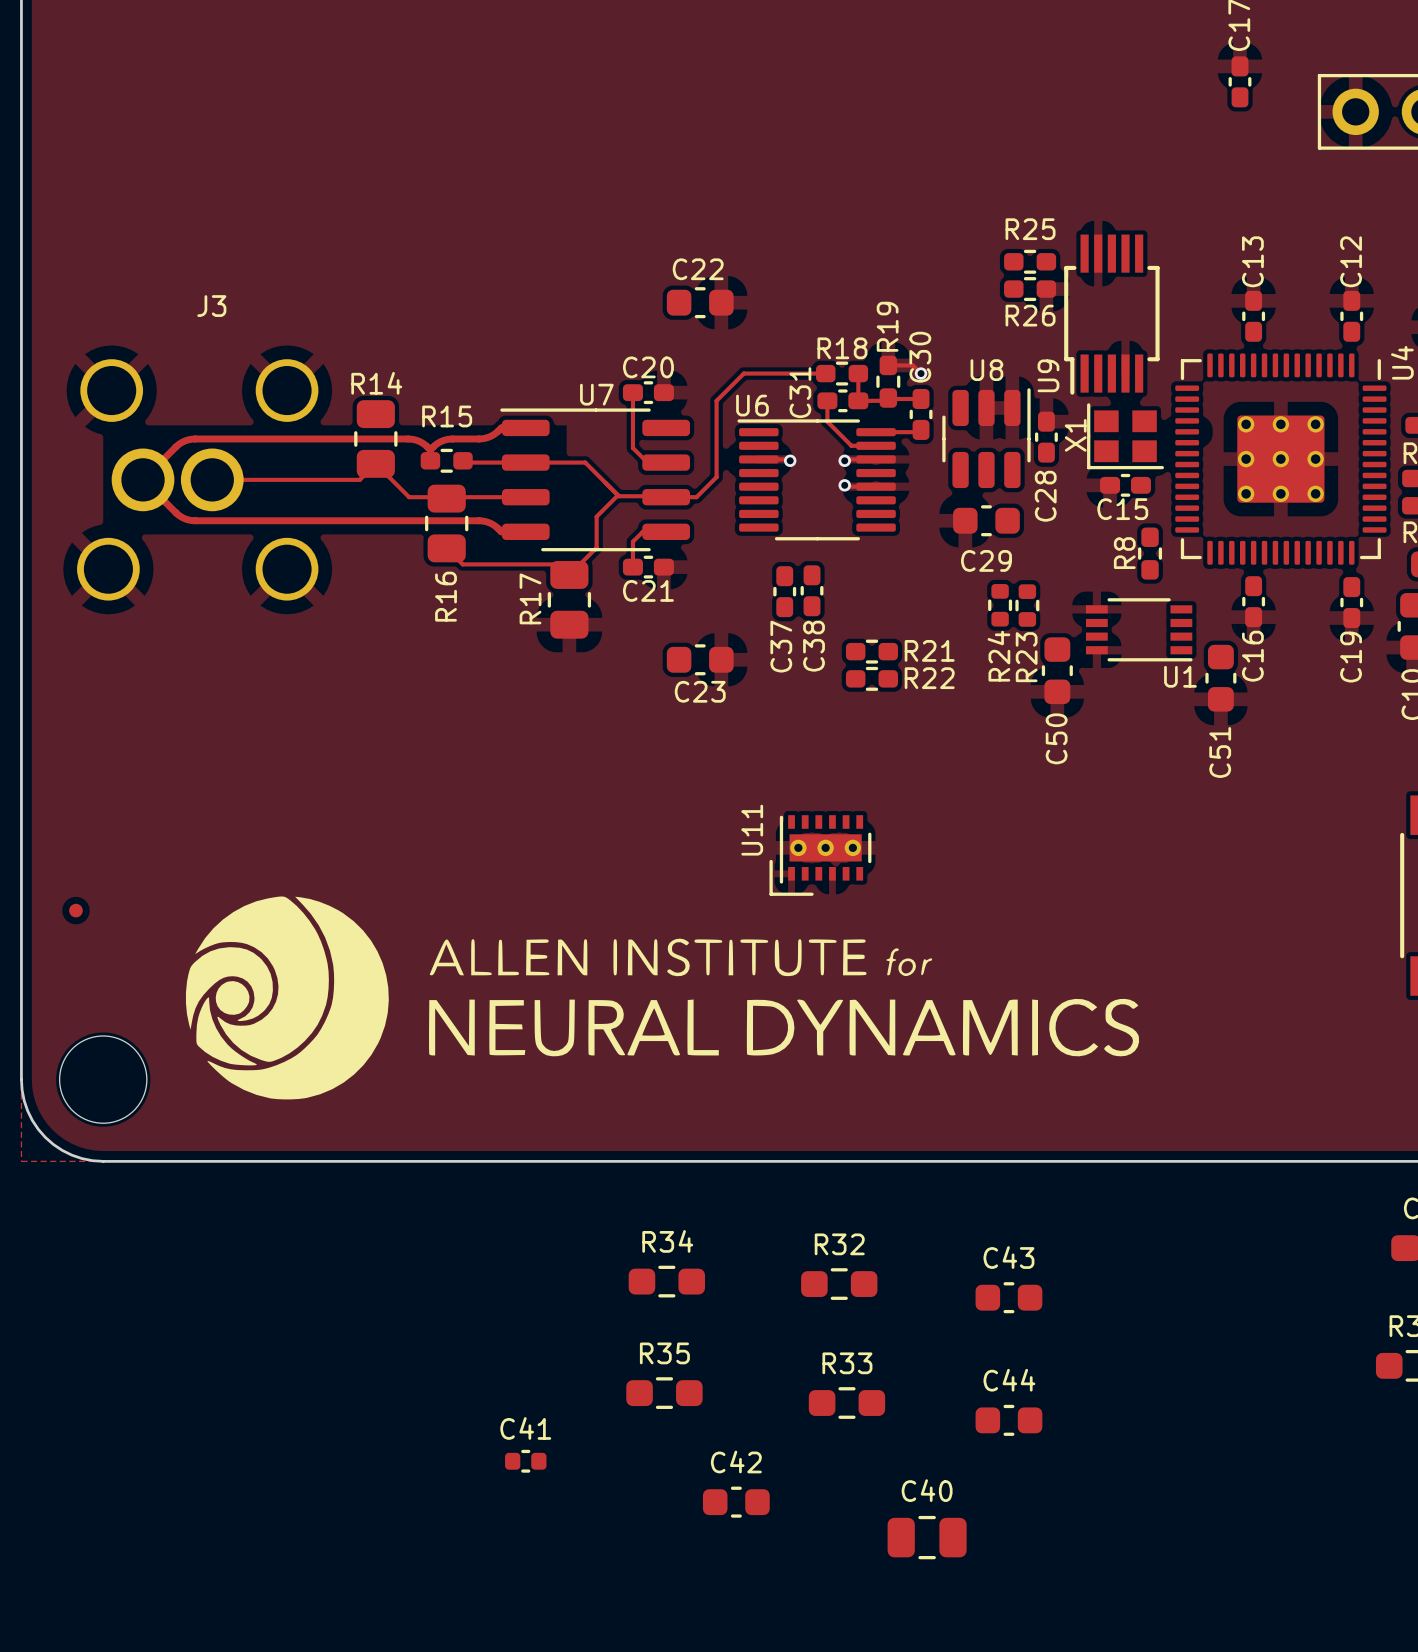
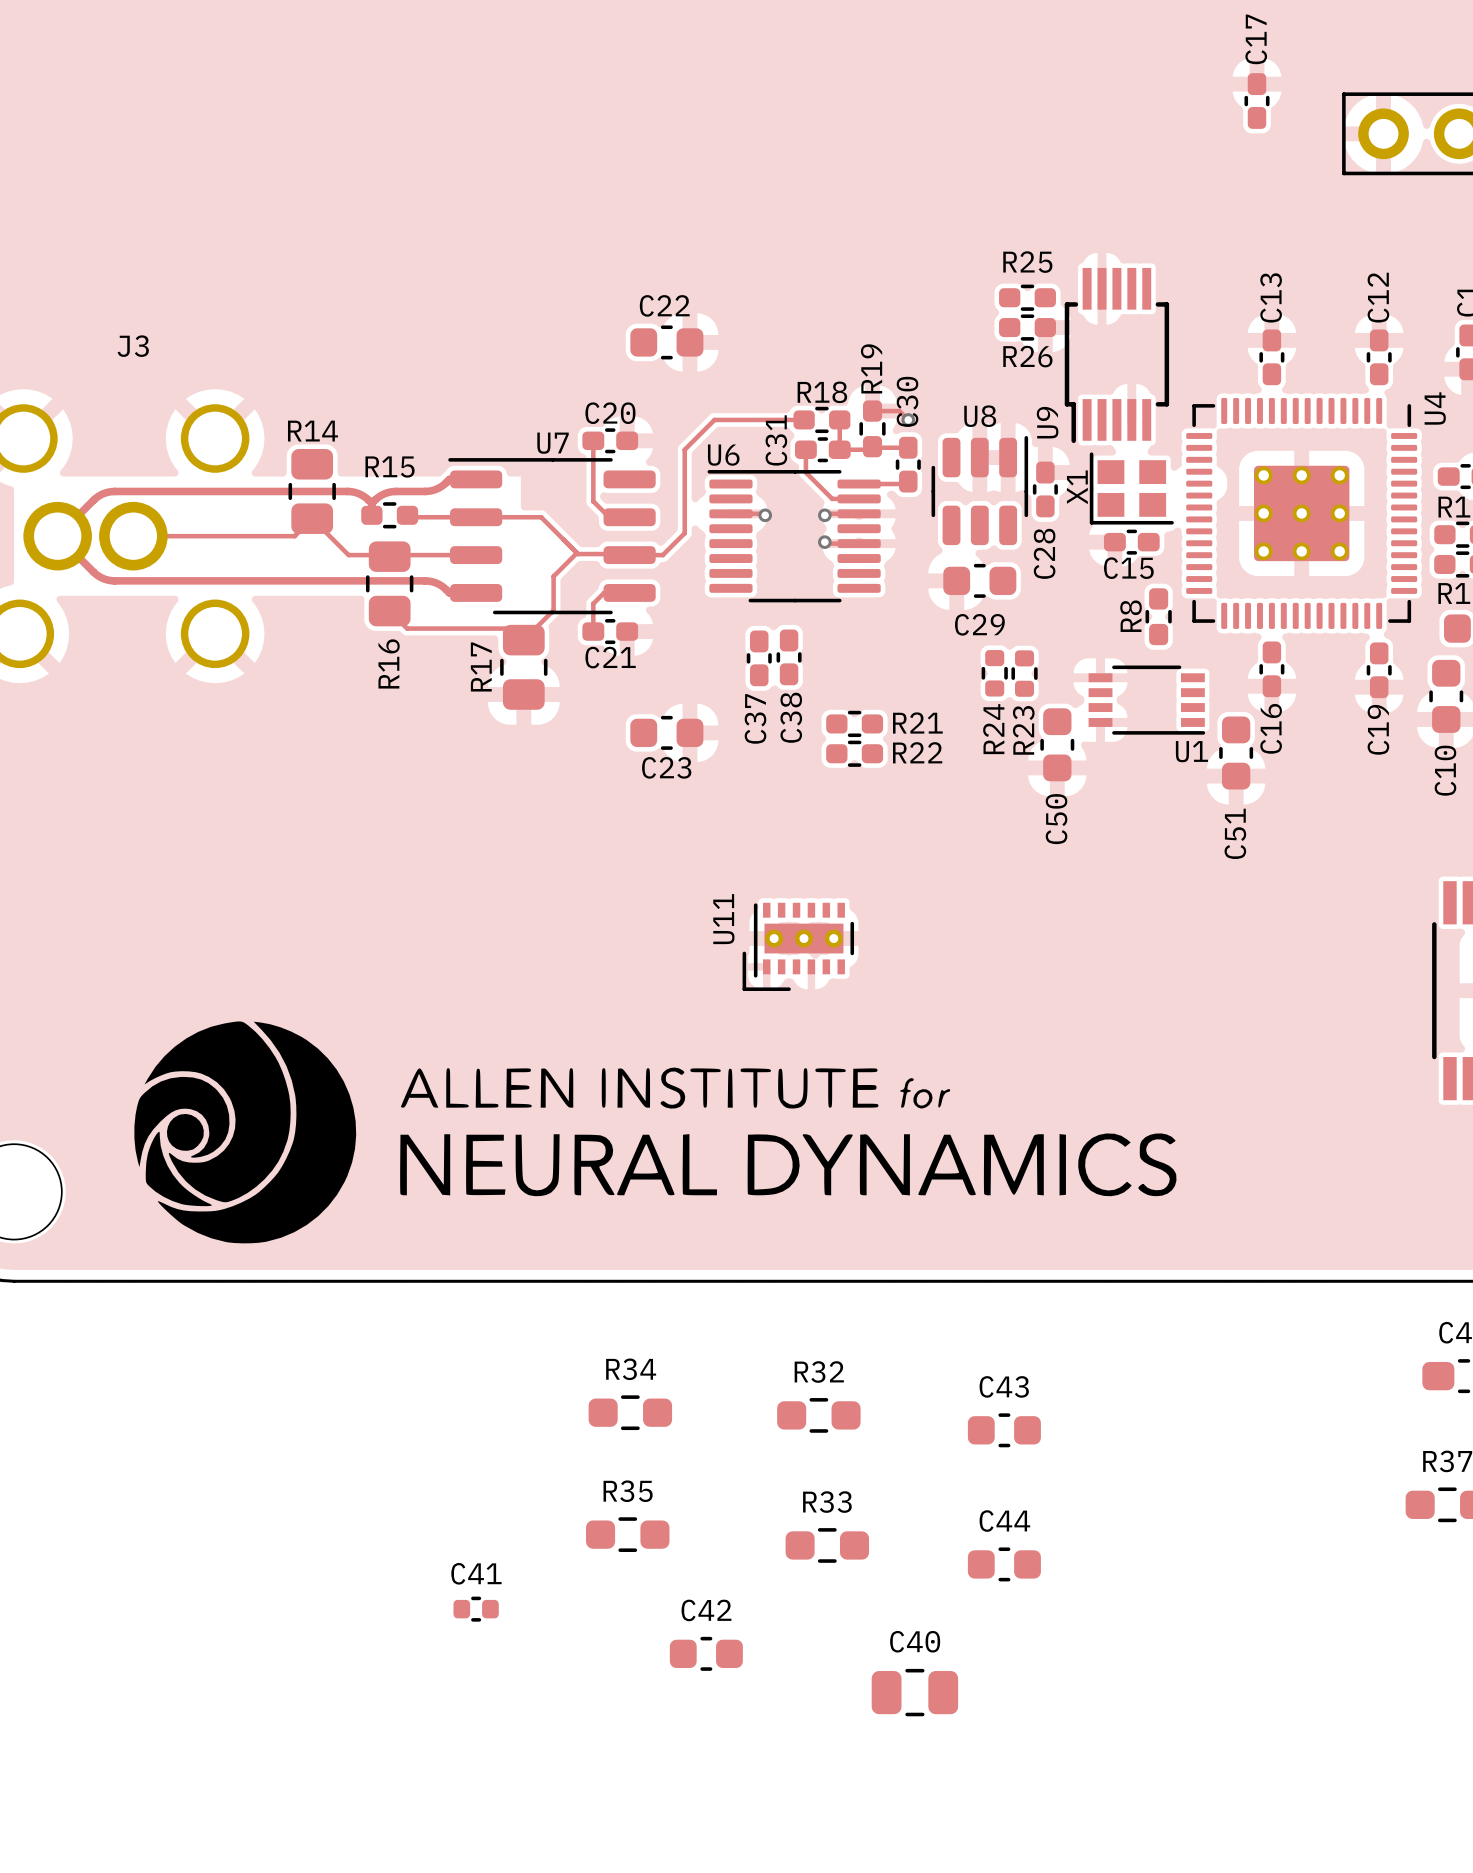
drawing position: (662, 997) -> (655, 1132)

